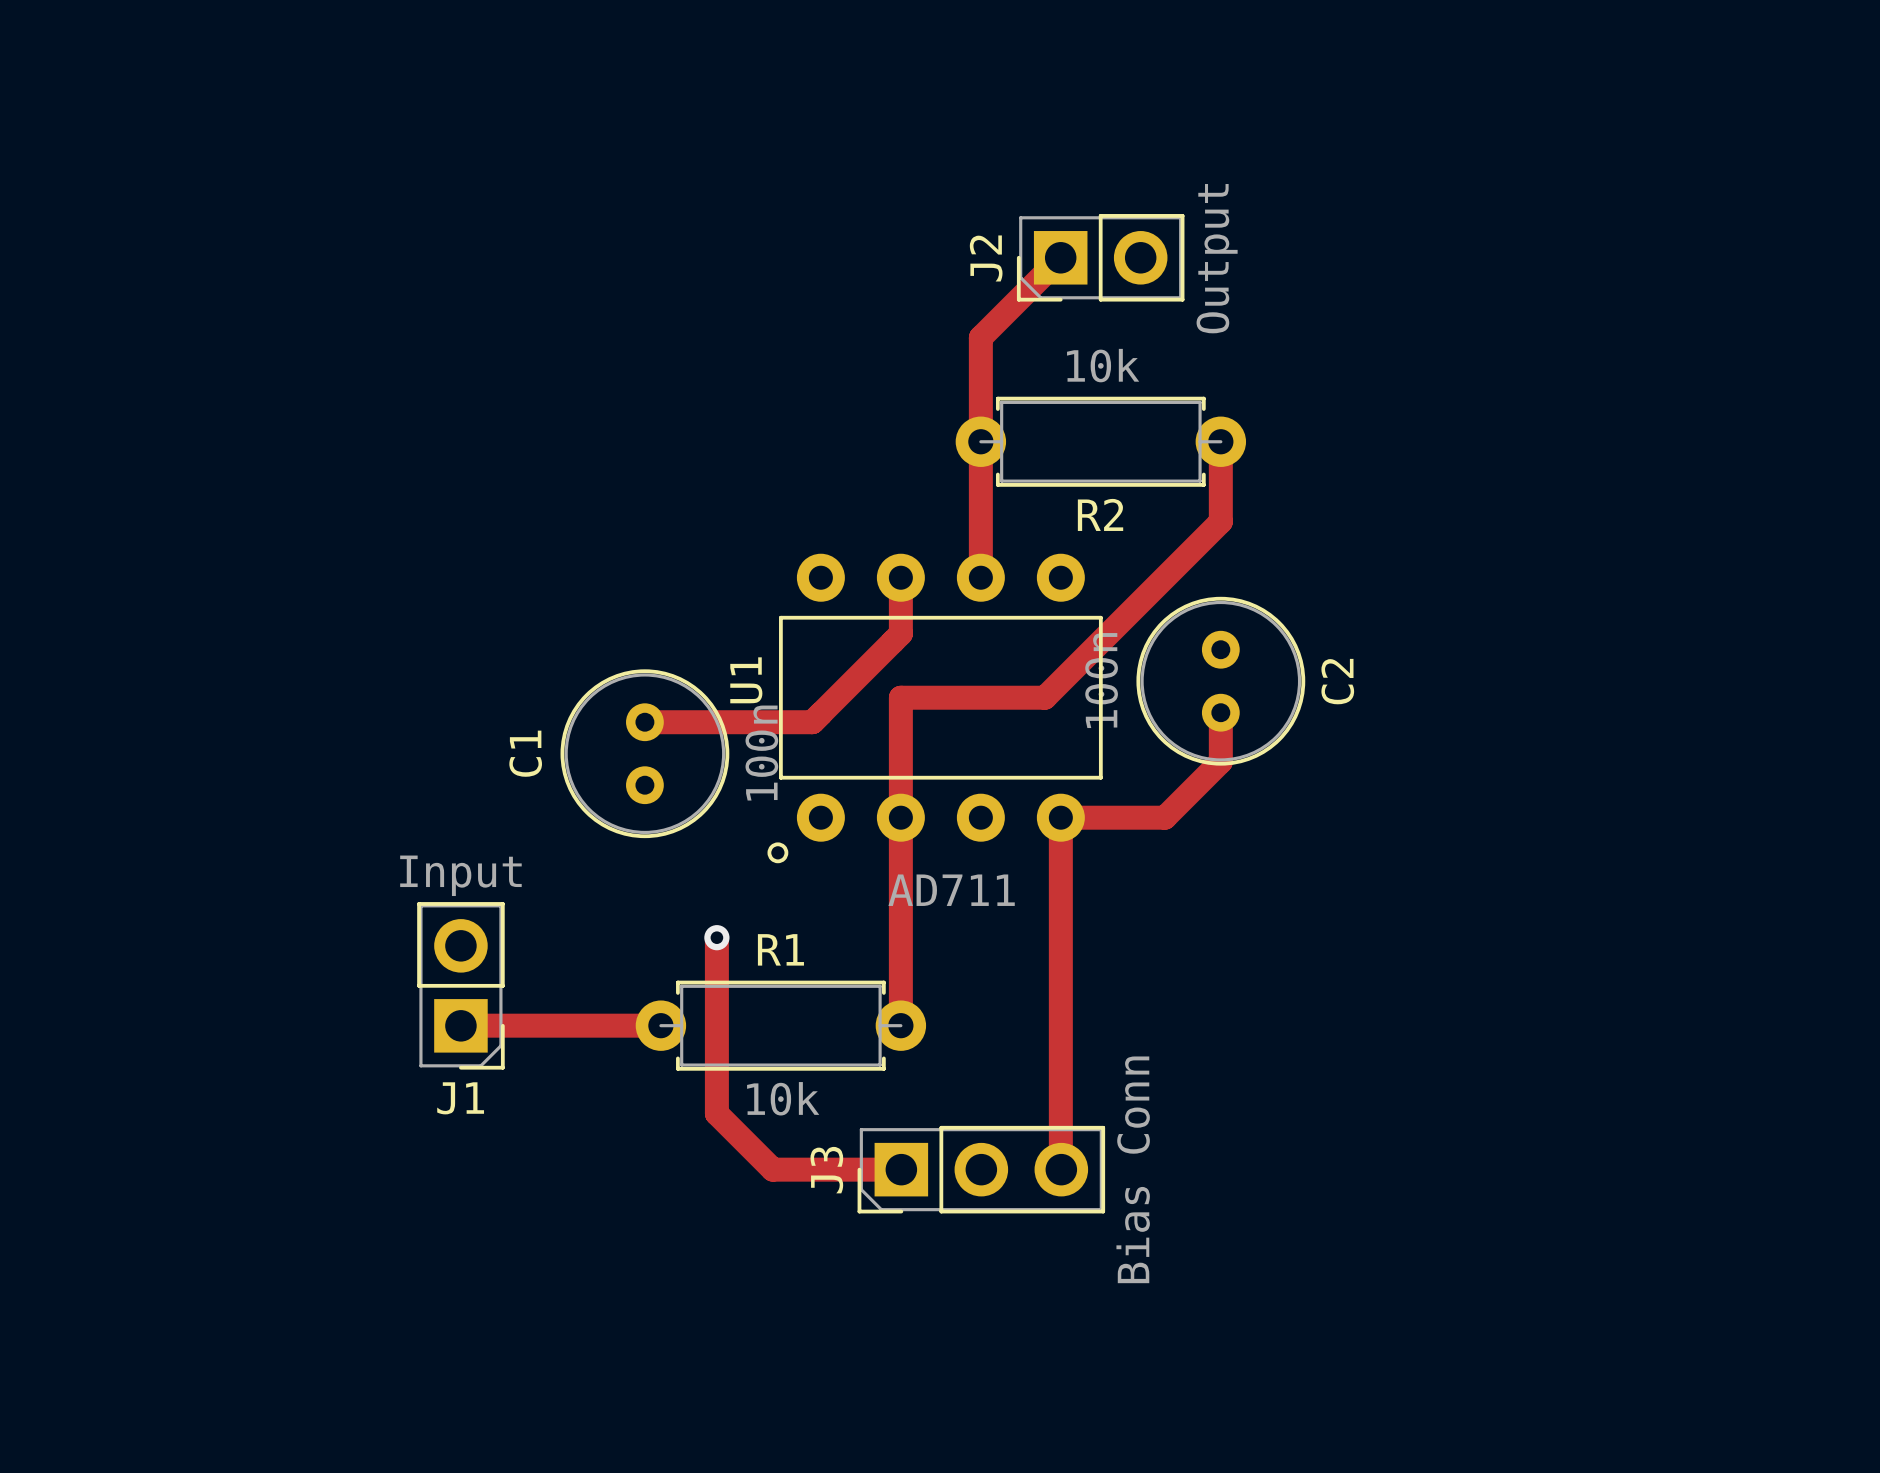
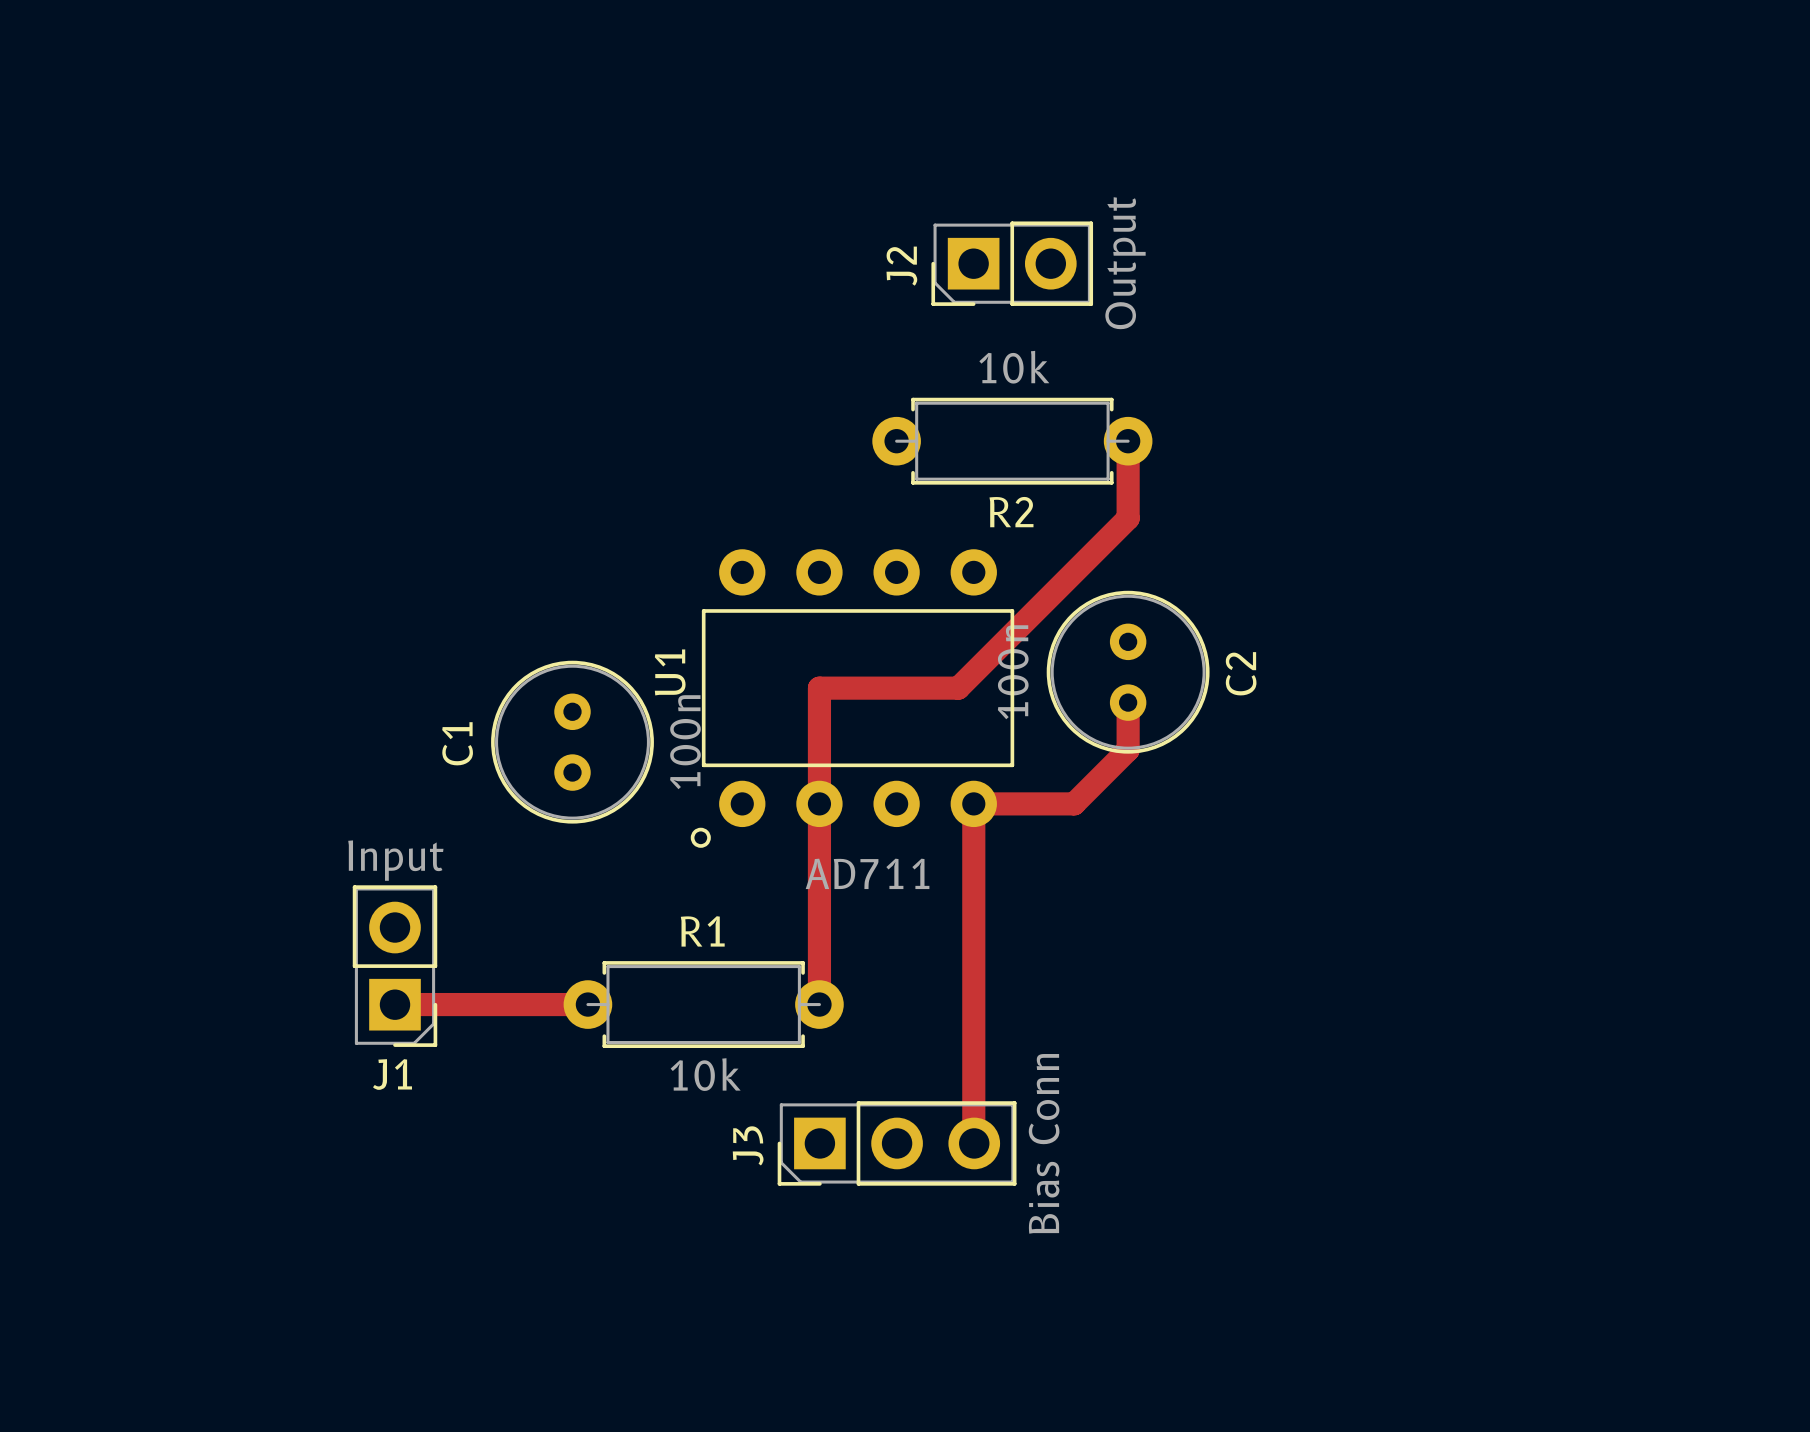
track: (1060, 257) (980, 337) (980, 577) -> none
track: (900, 577) (900, 633) (812, 722) (644, 722) -> none
track: (716, 937) (716, 1113) (772, 1169) (901, 1169) -> none
via: (716, 937) -> none

